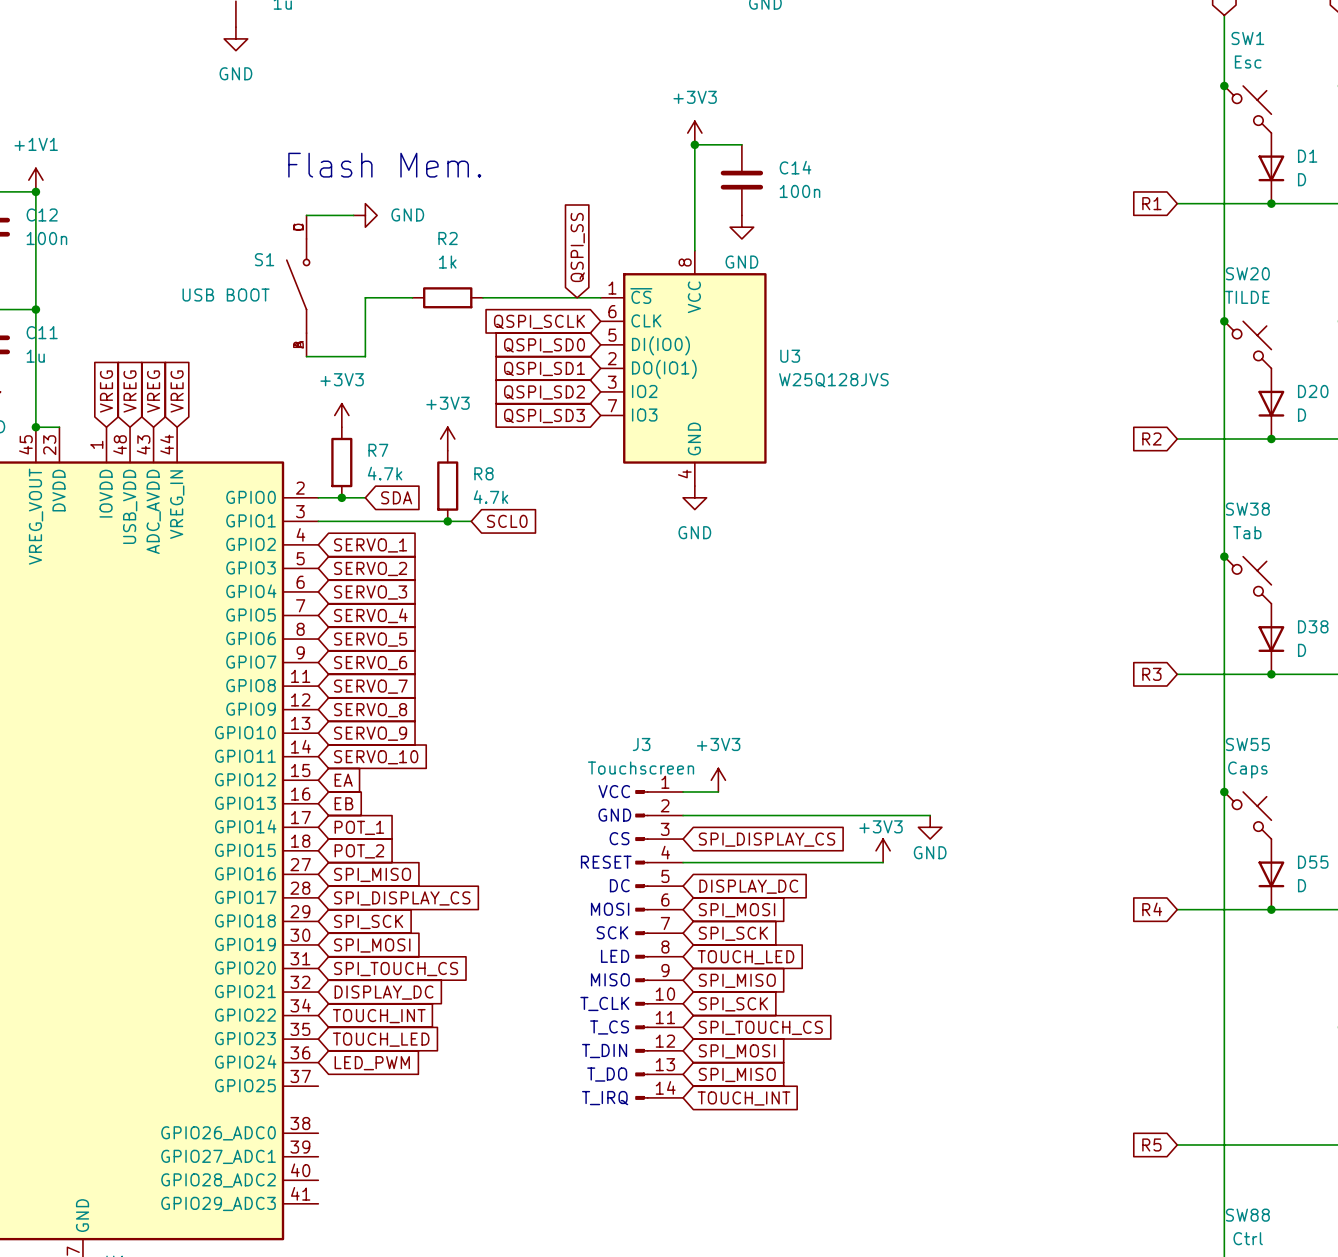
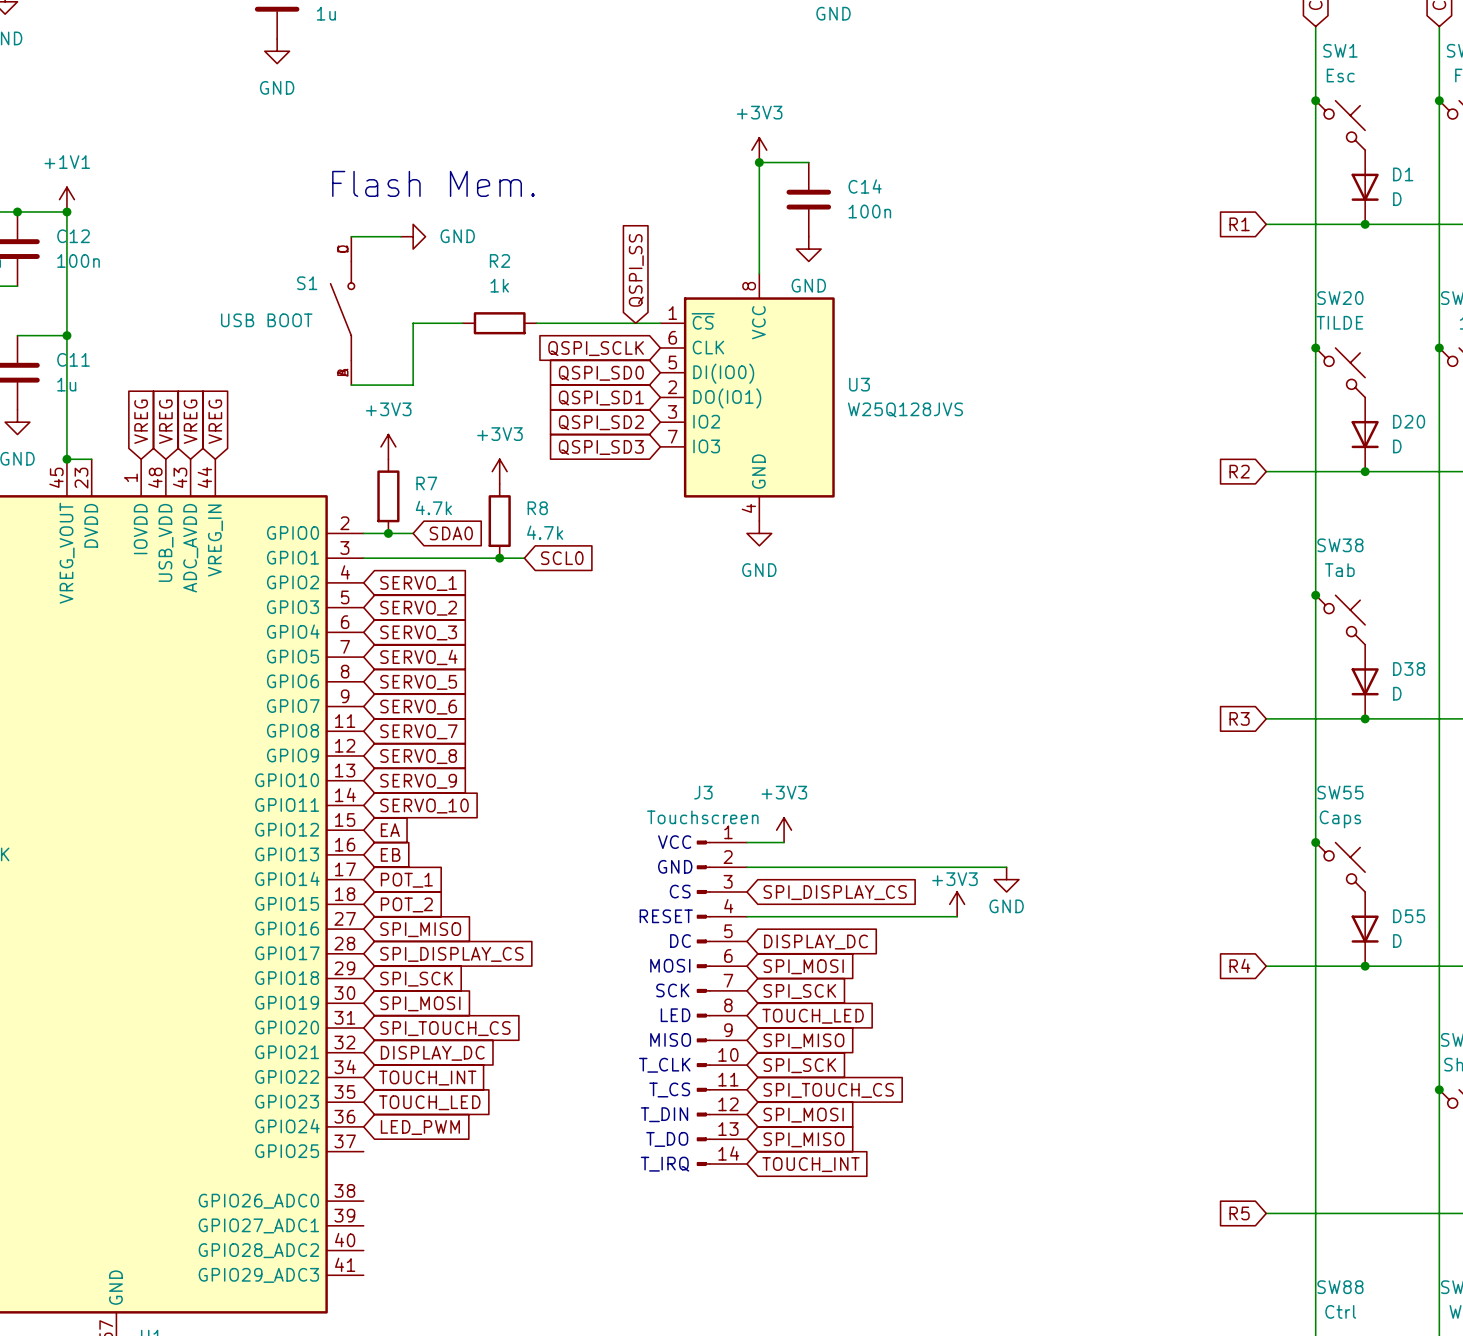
global label: SDA (396, 497) -> SDA0 (451, 533)

